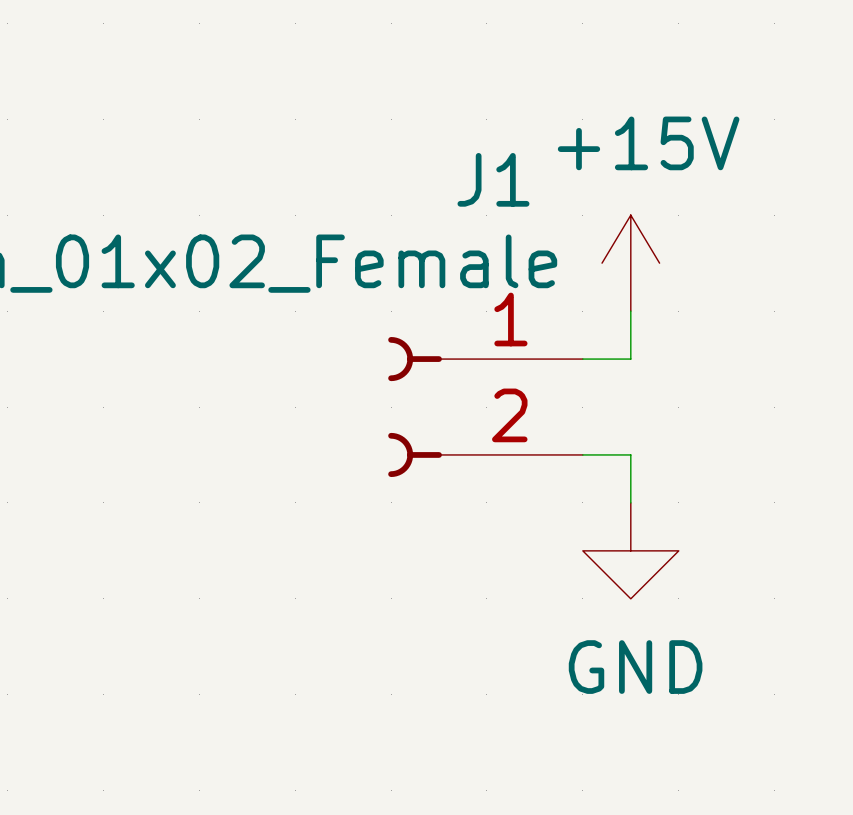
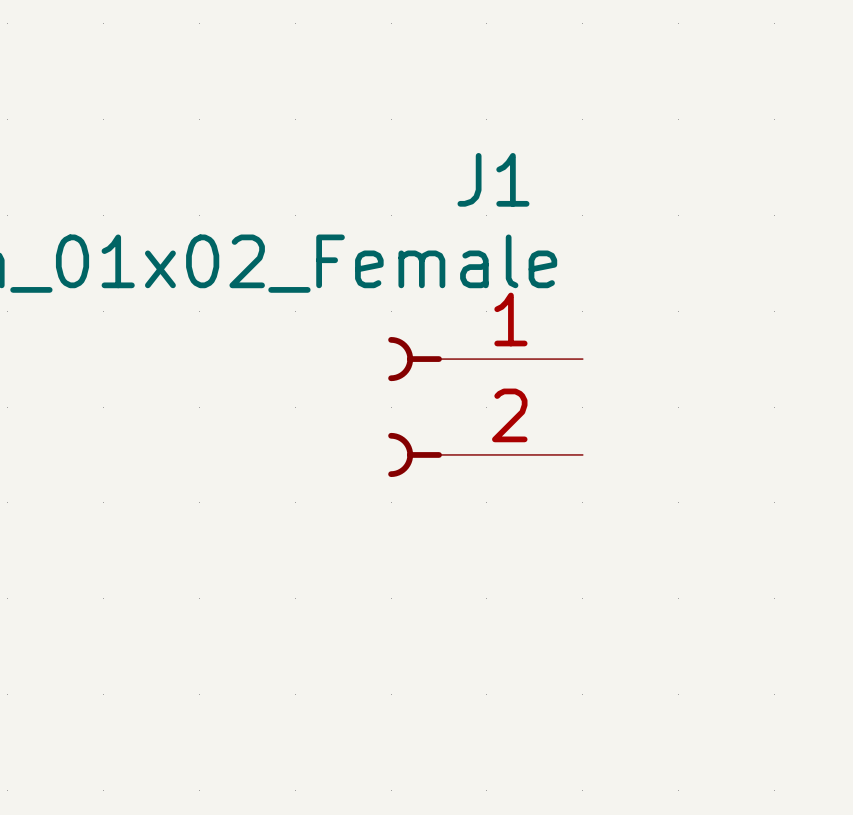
power symbol: +15V (630, 263) -> none
wire: (630, 311) (630, 359) (582, 359) -> none
wire: (582, 454) (630, 454) (630, 502) -> none
power symbol: GND (630, 550) -> none

